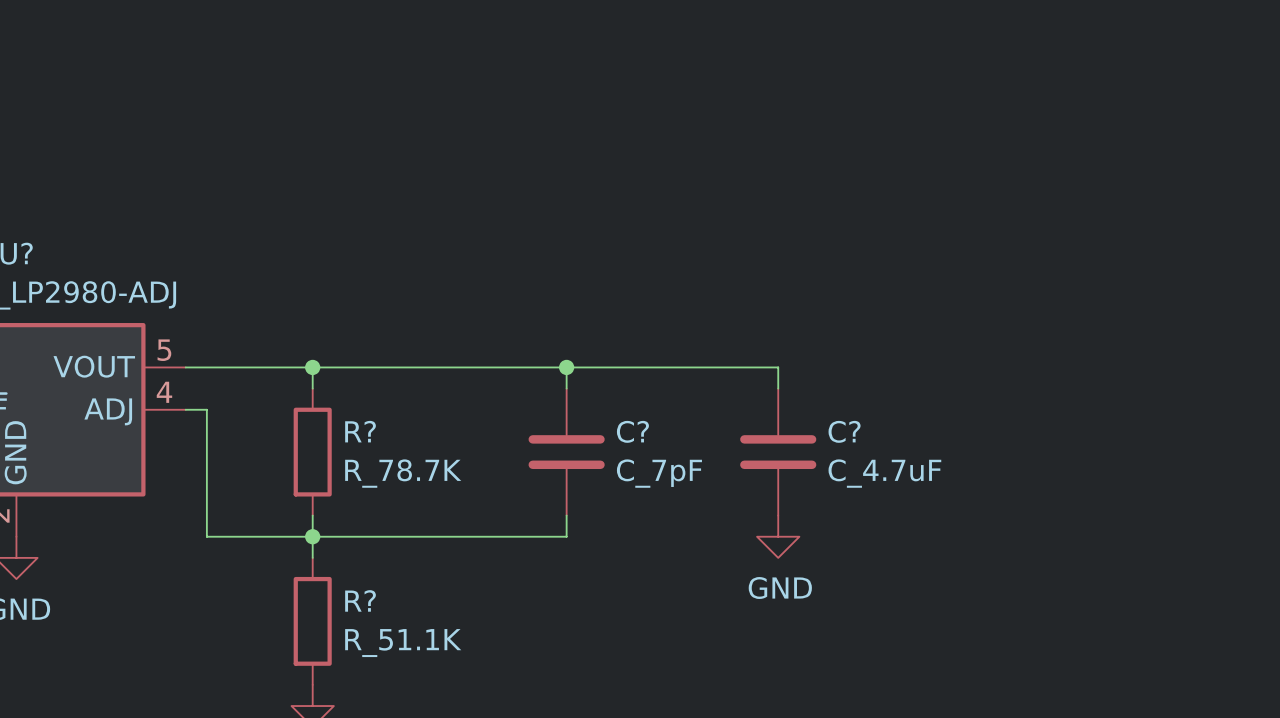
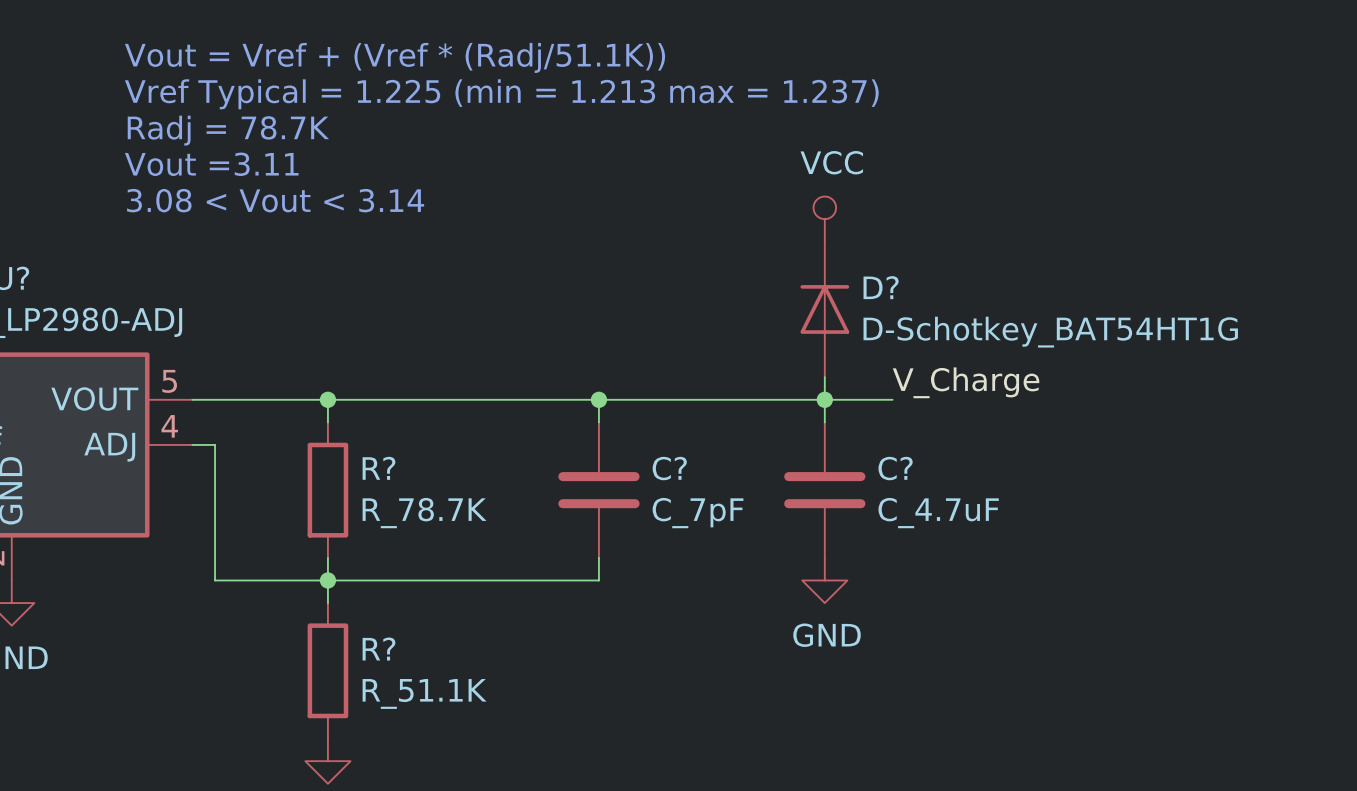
text: none -> Vout = Vref + (Vref * (Radj/51.1K)) (394, 57)
text: none -> Vref Typical = 1.225 (min = 1.213 max = 1.237) (501, 94)
text: none -> Radj = 78.7K (228, 130)
text: none -> Vout =3.11 (211, 164)
text: none -> 3.08 < Vout < 3.14 (275, 200)
power symbol: none -> VCC (824, 219)
D?: none -> D-Schotkey_BAT54HT1G (824, 309)
wire: none -> (824, 377) (824, 399) (892, 399)
label: none -> V_Charge (966, 382)
junction: none -> (824, 399)

